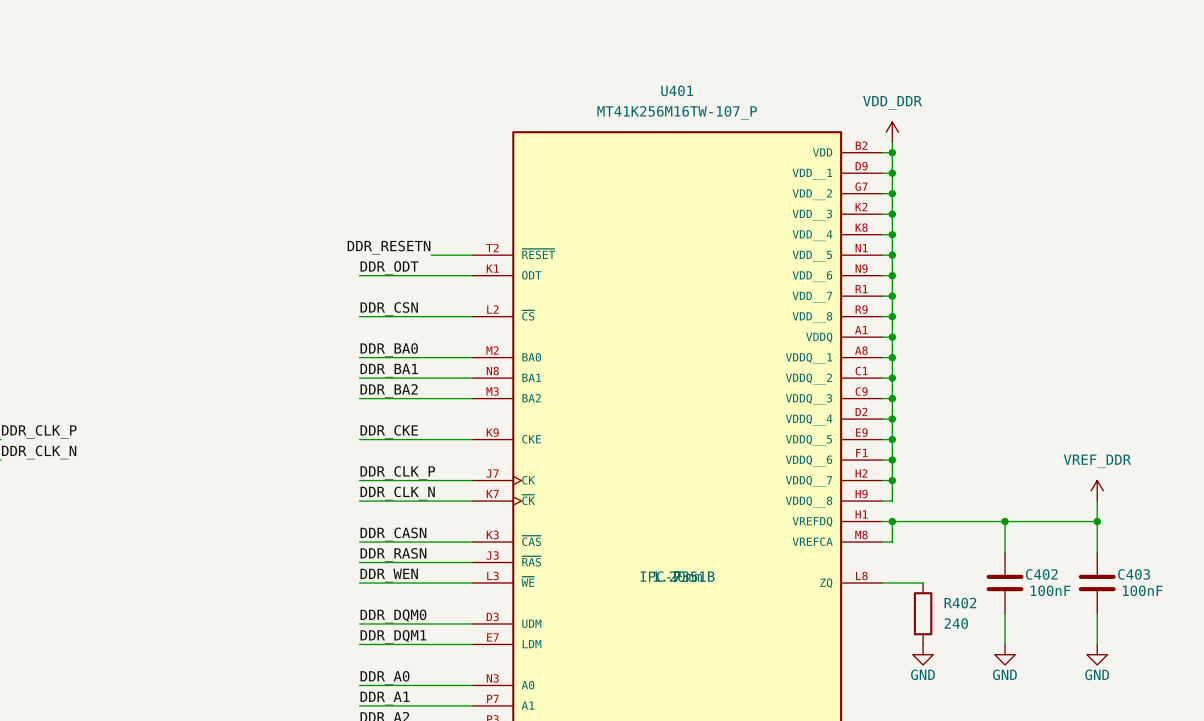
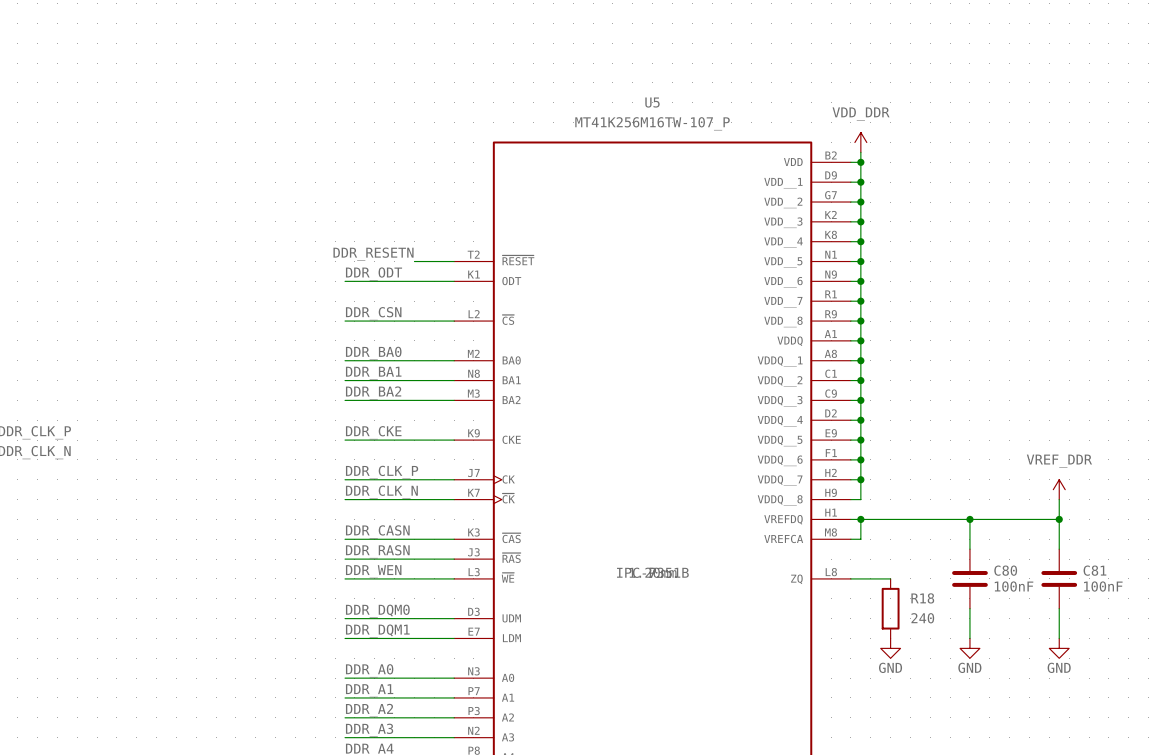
U401 name: U401 (677, 90) -> U5 (652, 102)
C402 name: C402 (1041, 574) -> C80 (1005, 570)
C403 name: C403 (1134, 574) -> C81 (1094, 570)
R402 name: R402 (960, 603) -> R18 (922, 598)

